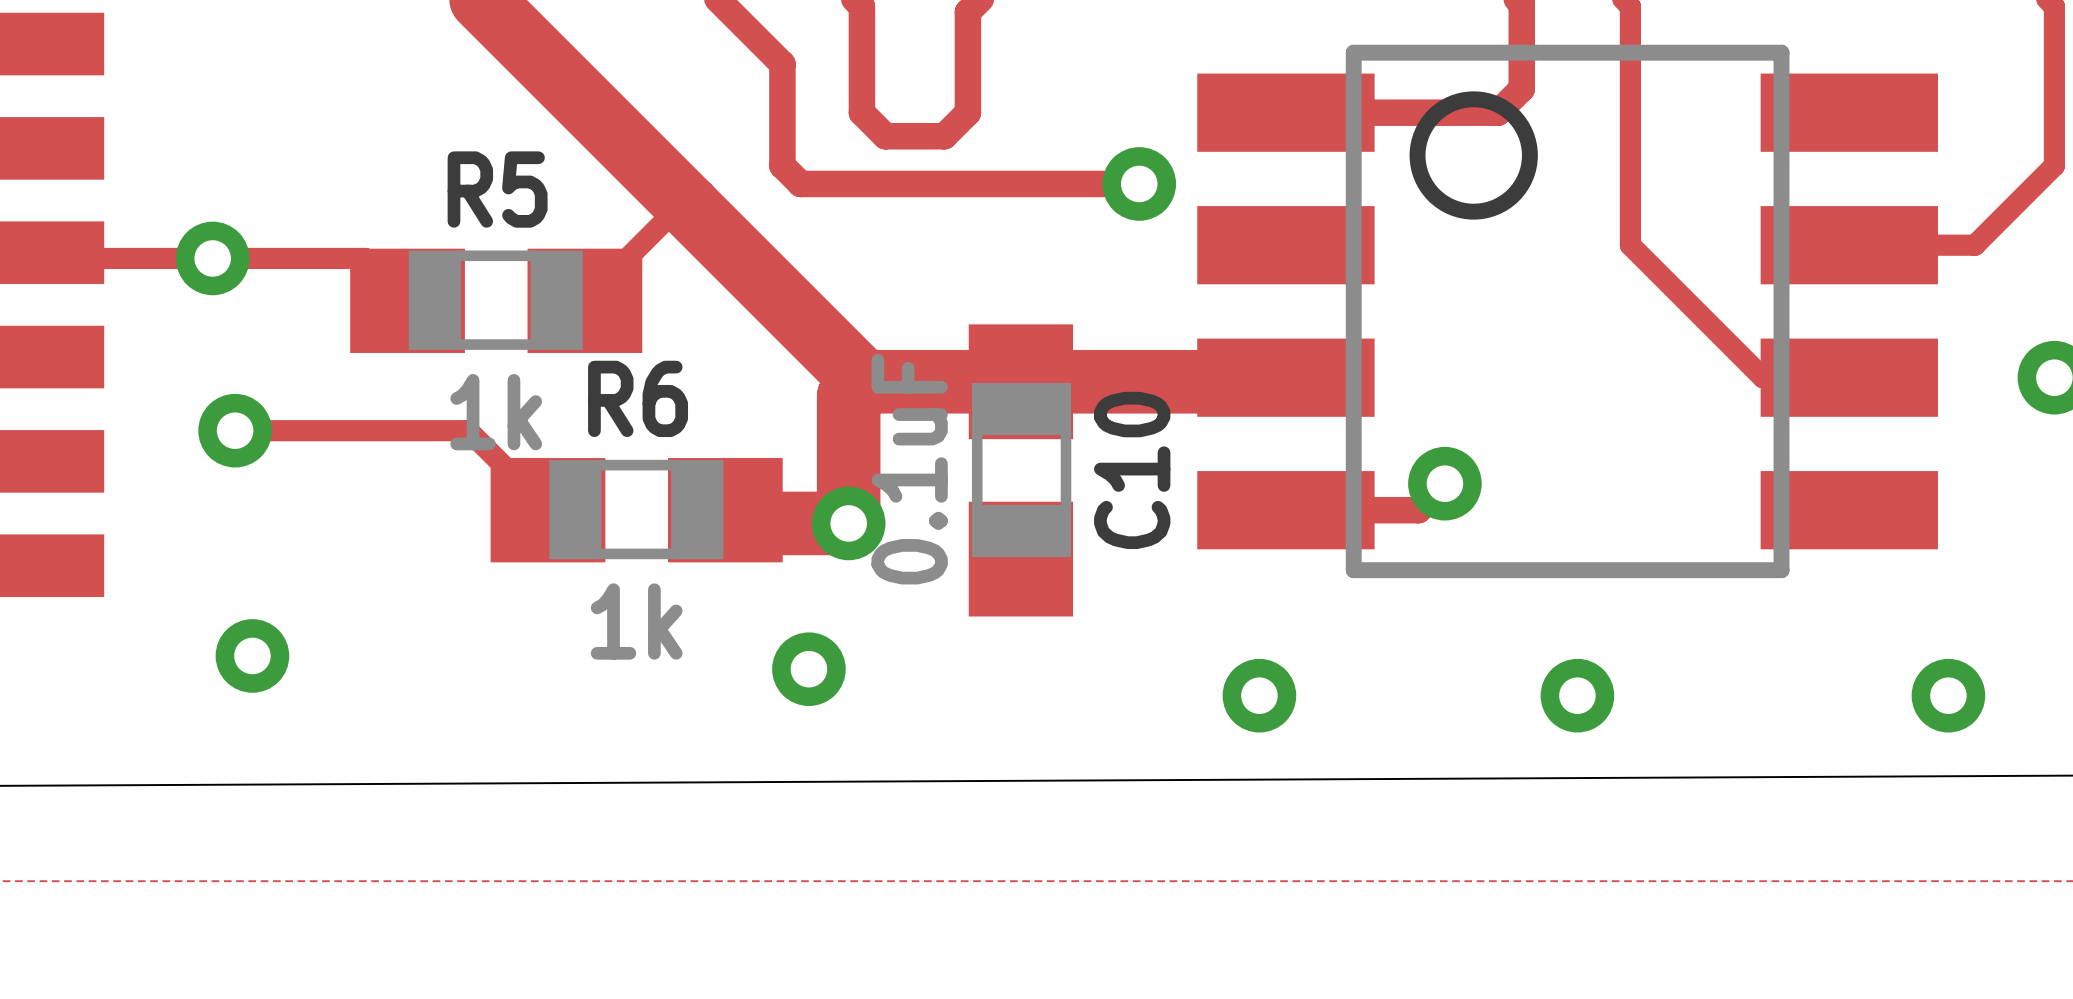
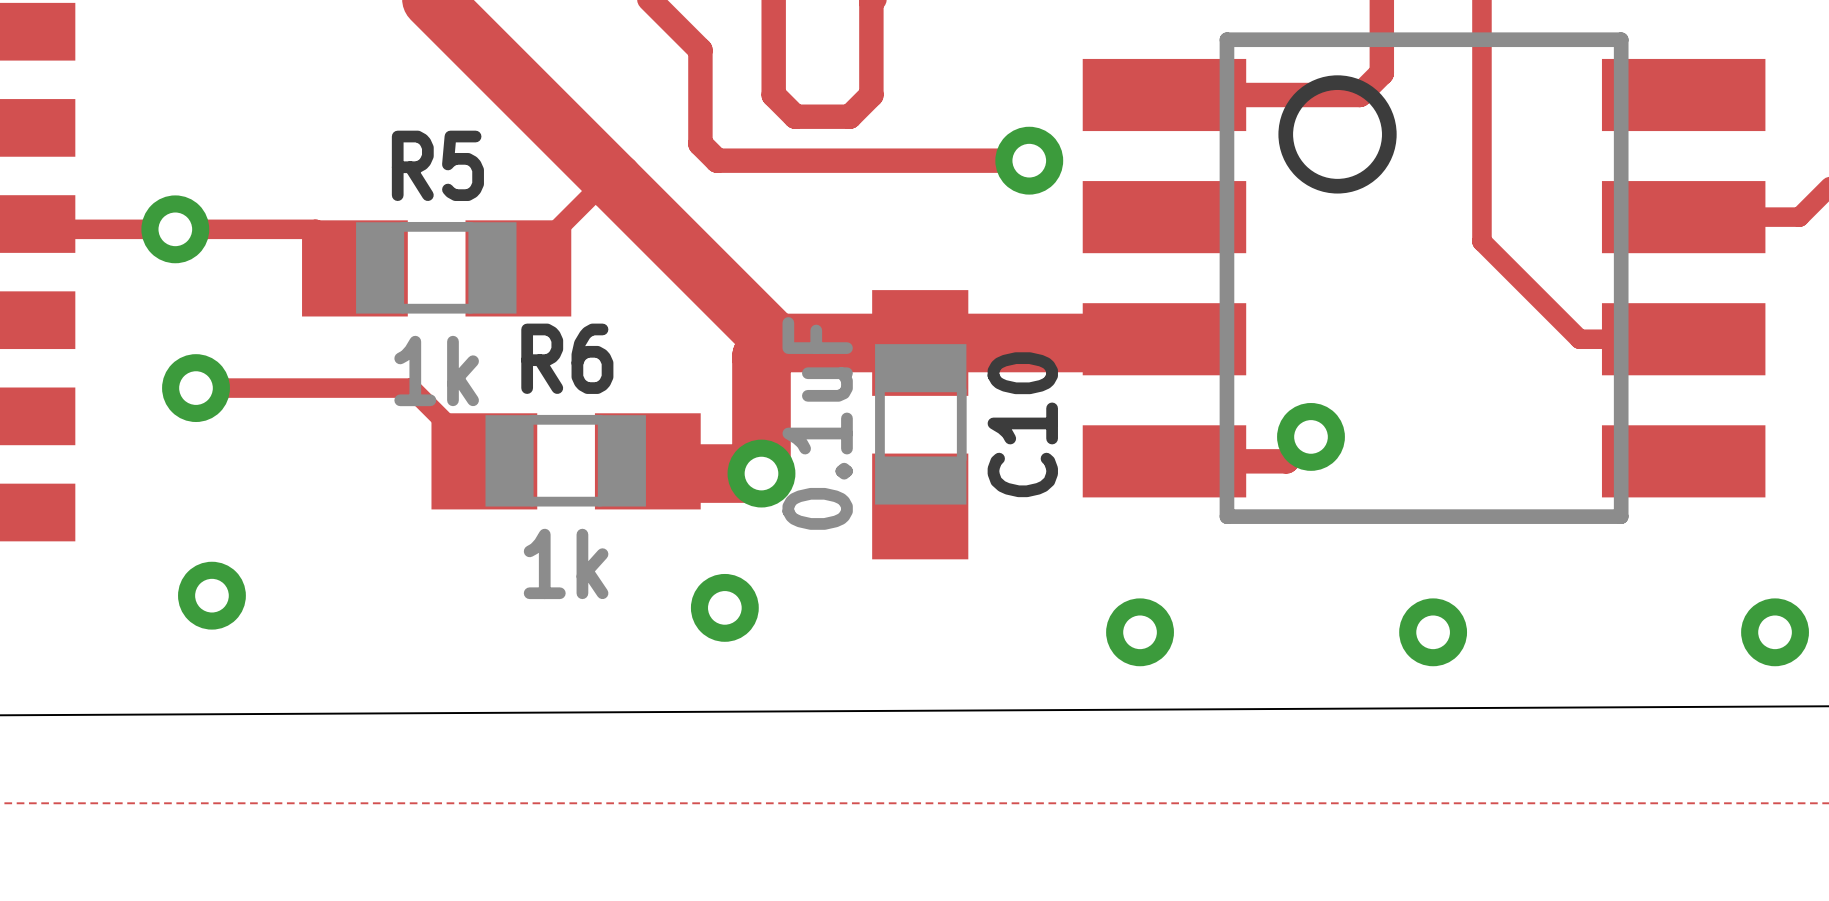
track: (1630, 245) (1762, 377) -> (1481, 217) (1481, 241) (1579, 339) (1604, 339)

